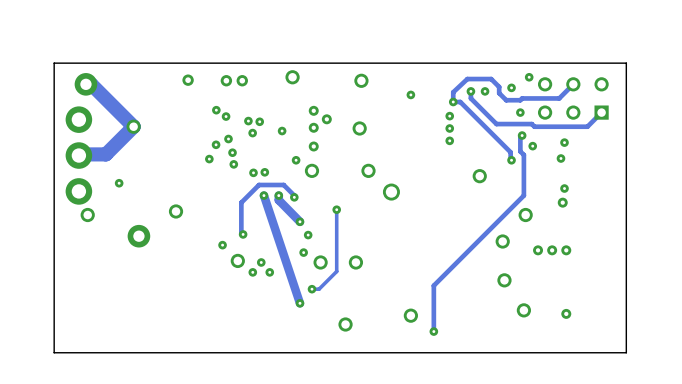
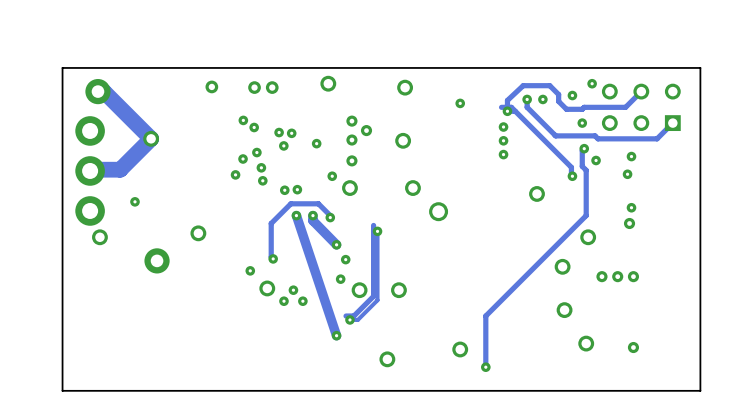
track: none -> (501, 107) (511, 107) (515, 111)
track: none -> (373, 225) (373, 296) (353, 316) (346, 316)

